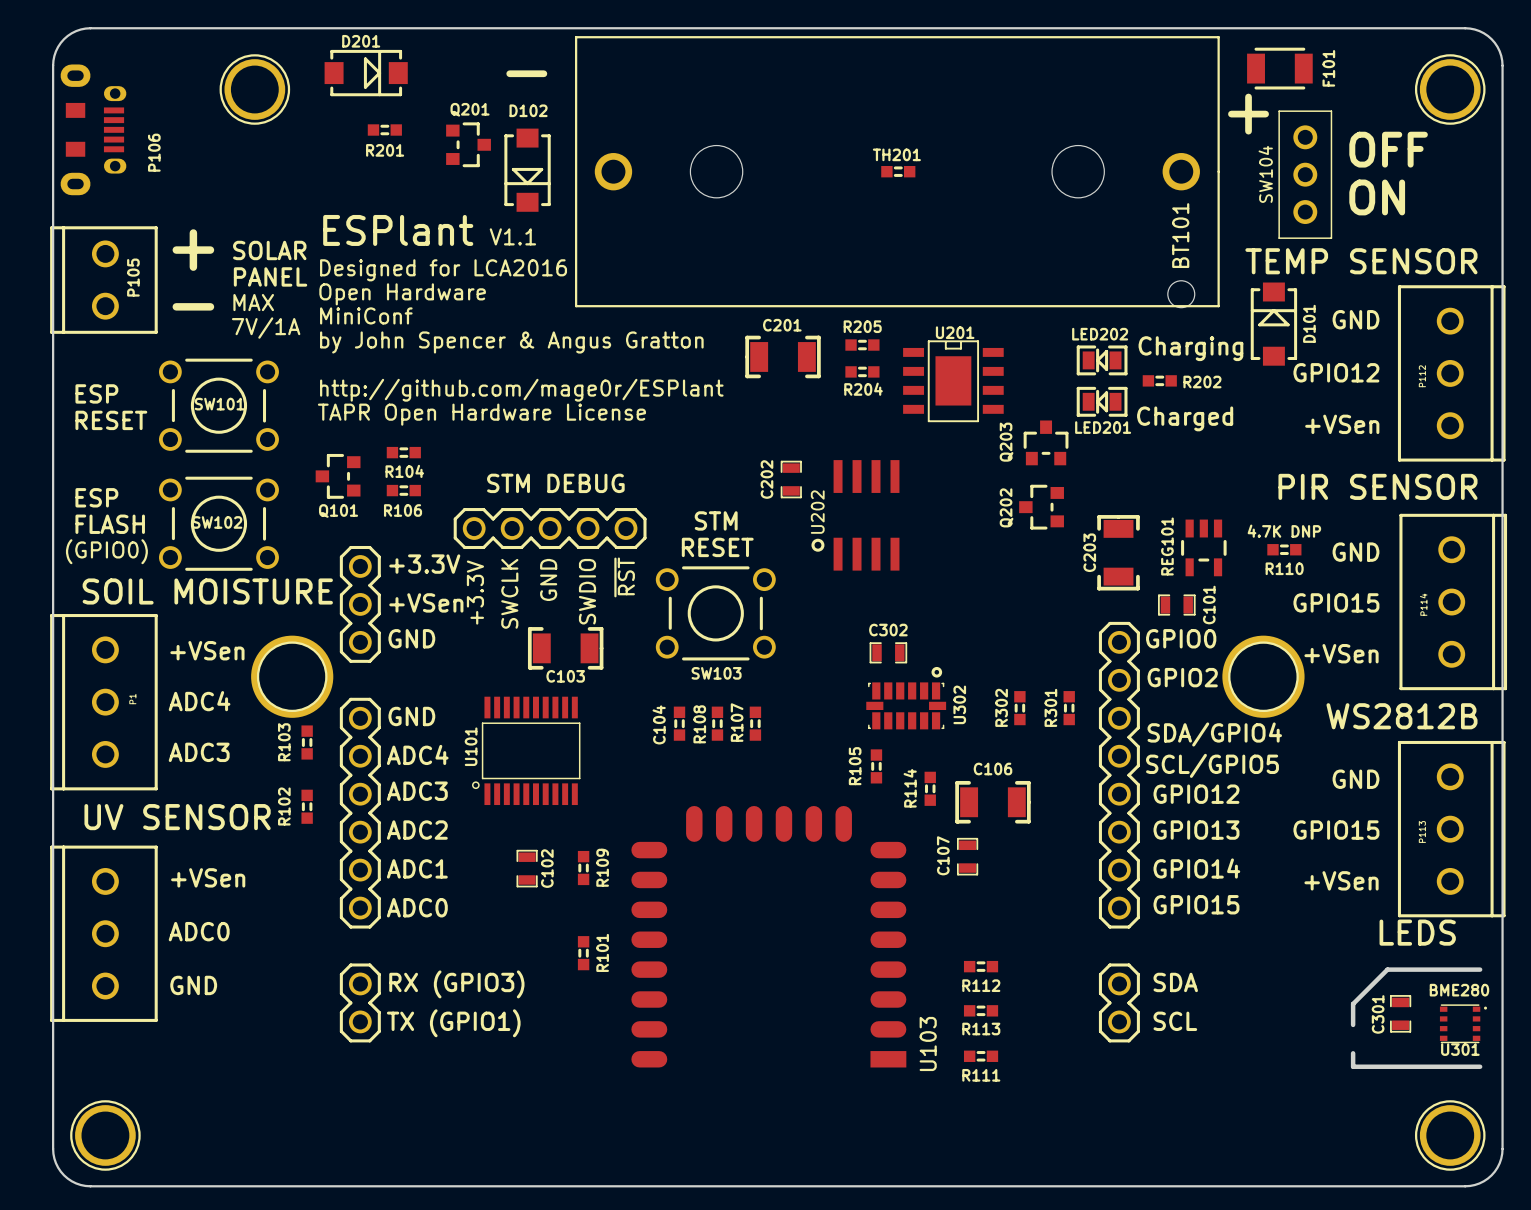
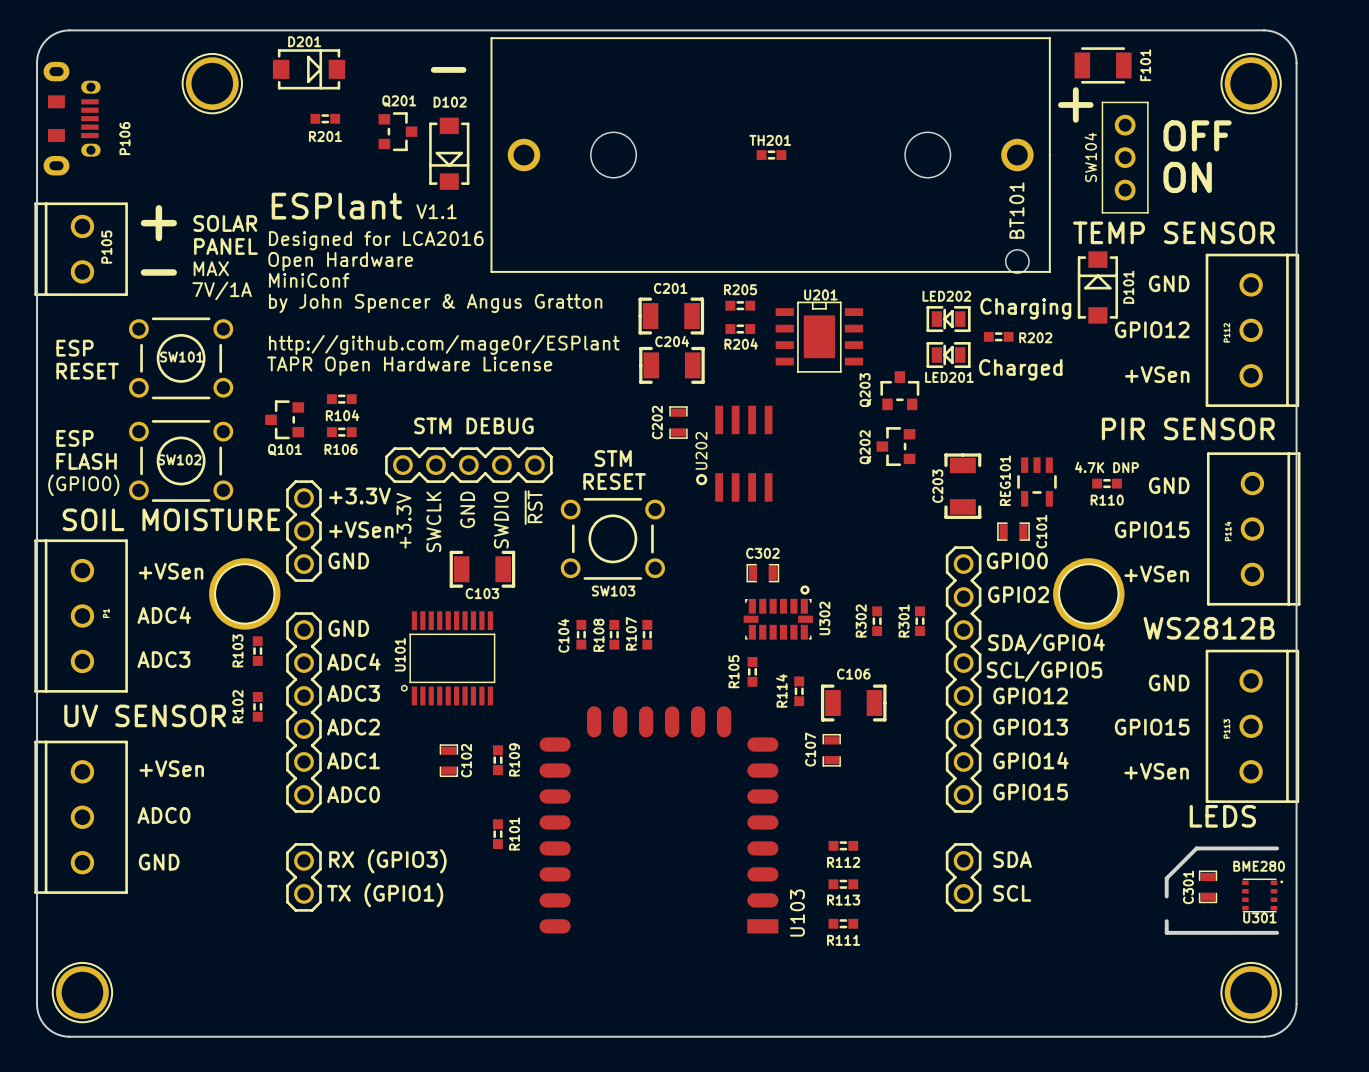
C204: none -> (671, 365)

